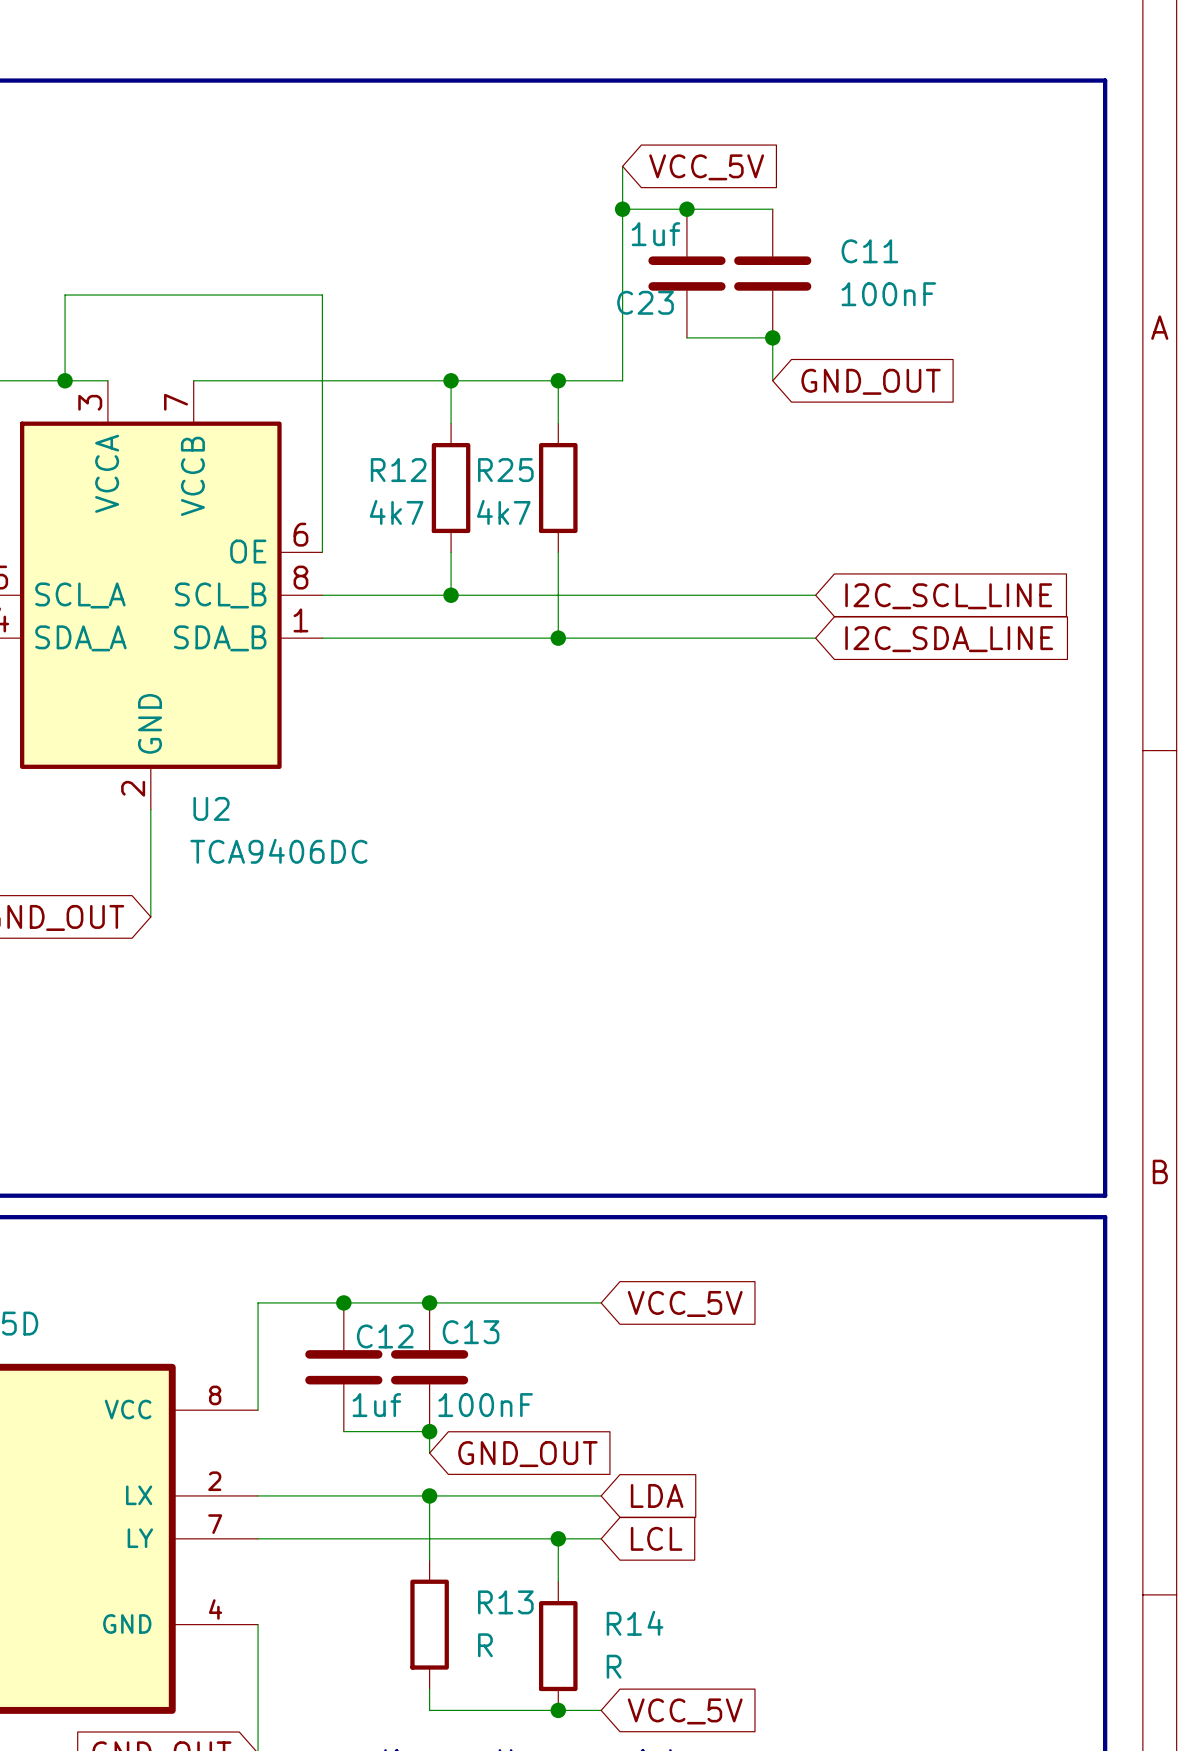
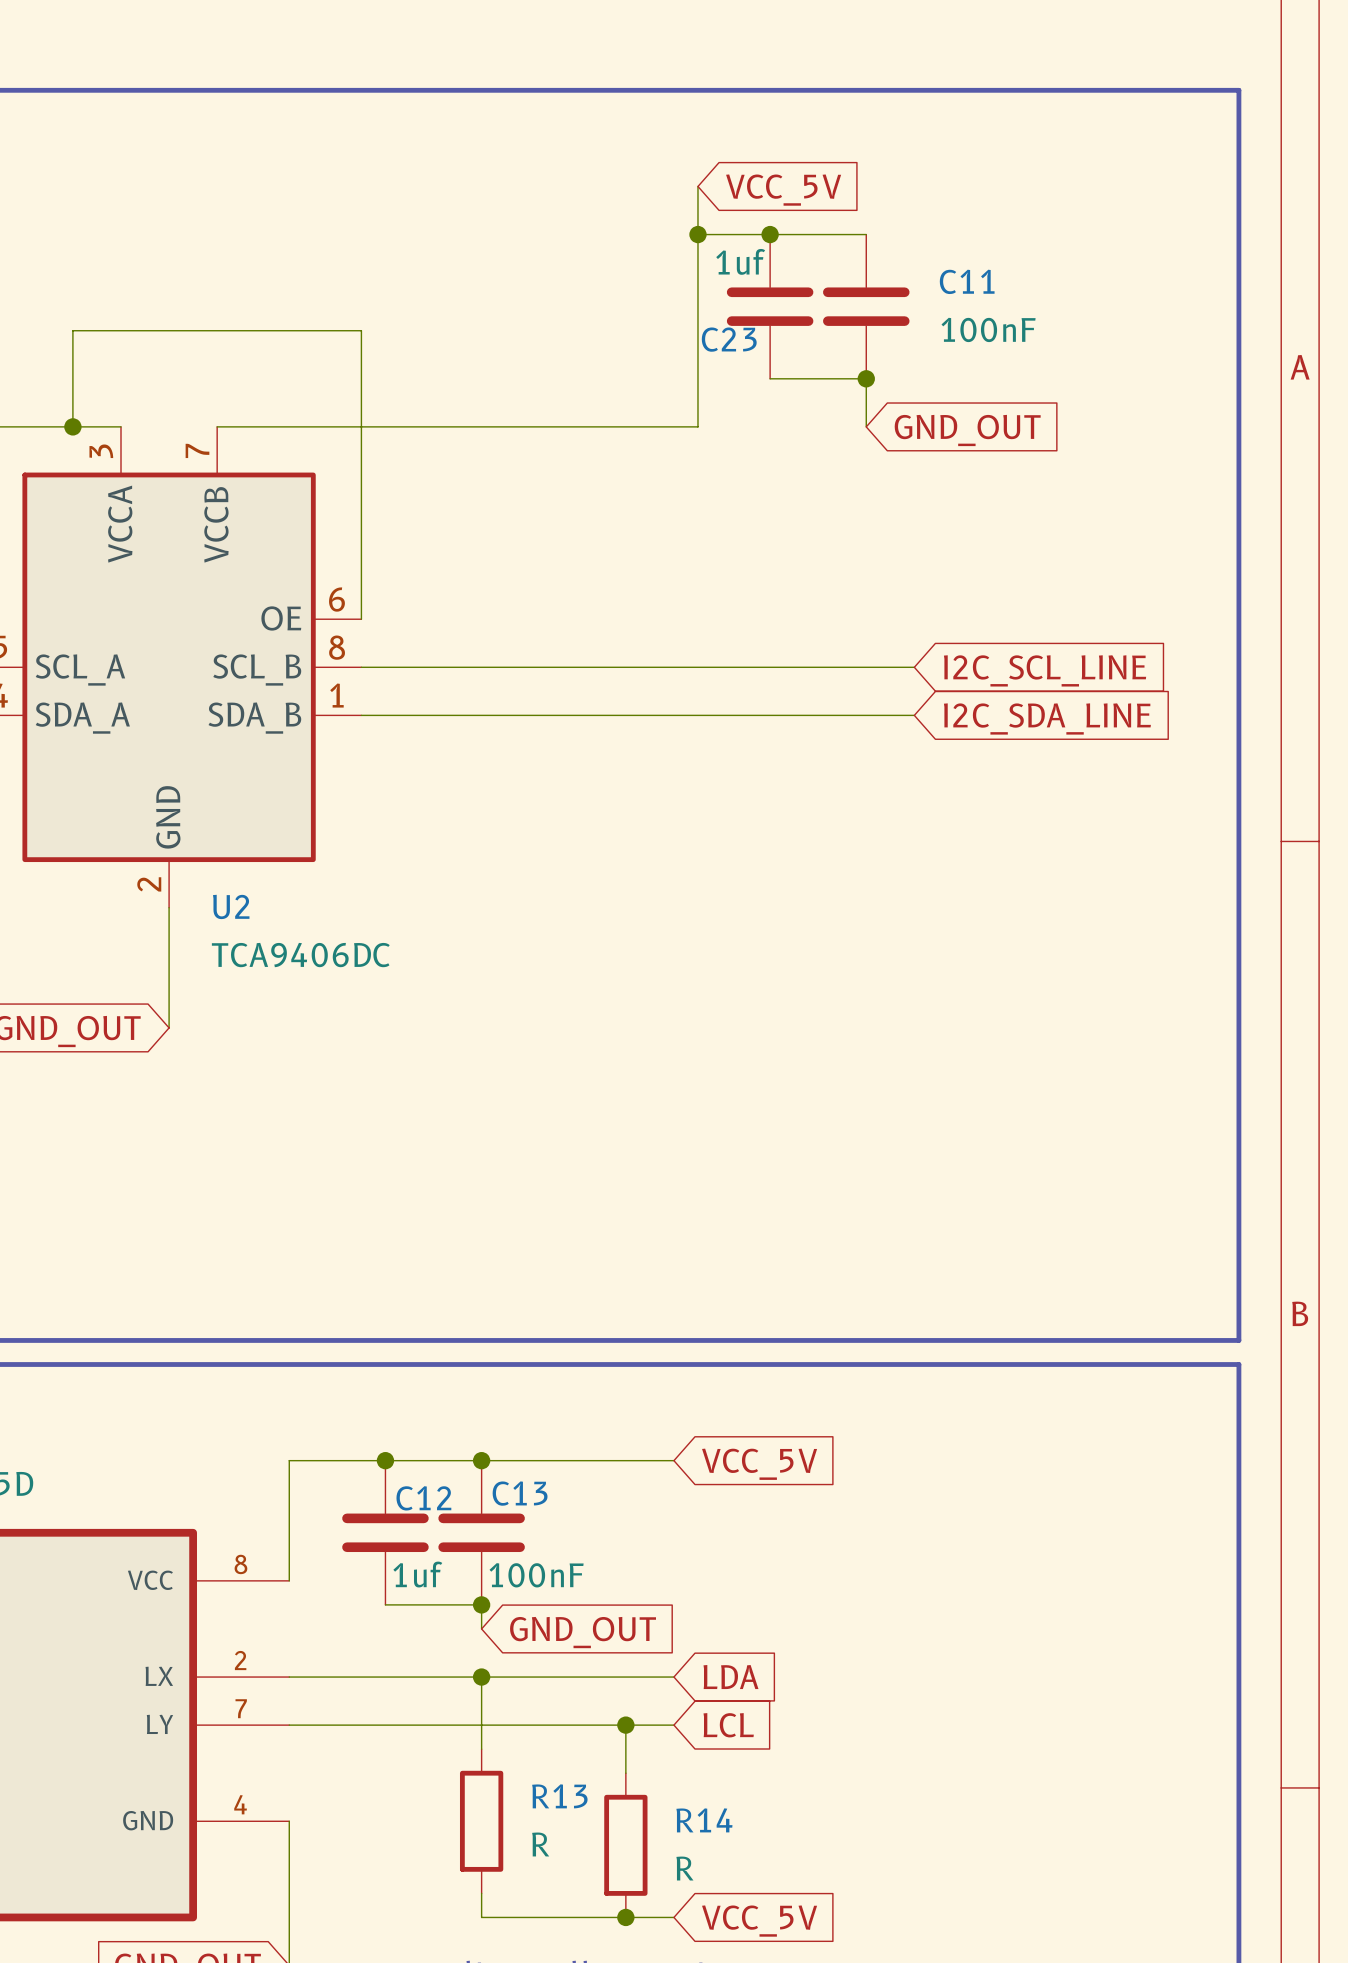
wire: (451, 380) (451, 423) -> none
junction: (451, 380) -> none
wire: (558, 380) (558, 423) -> none
junction: (558, 380) -> none
R12: 4k7 (451, 488) -> none
R25: 4k7 (558, 488) -> none
wire: (451, 552) (451, 595) -> none
wire: (558, 552) (558, 638) -> none
junction: (451, 595) -> none
junction: (558, 638) -> none

